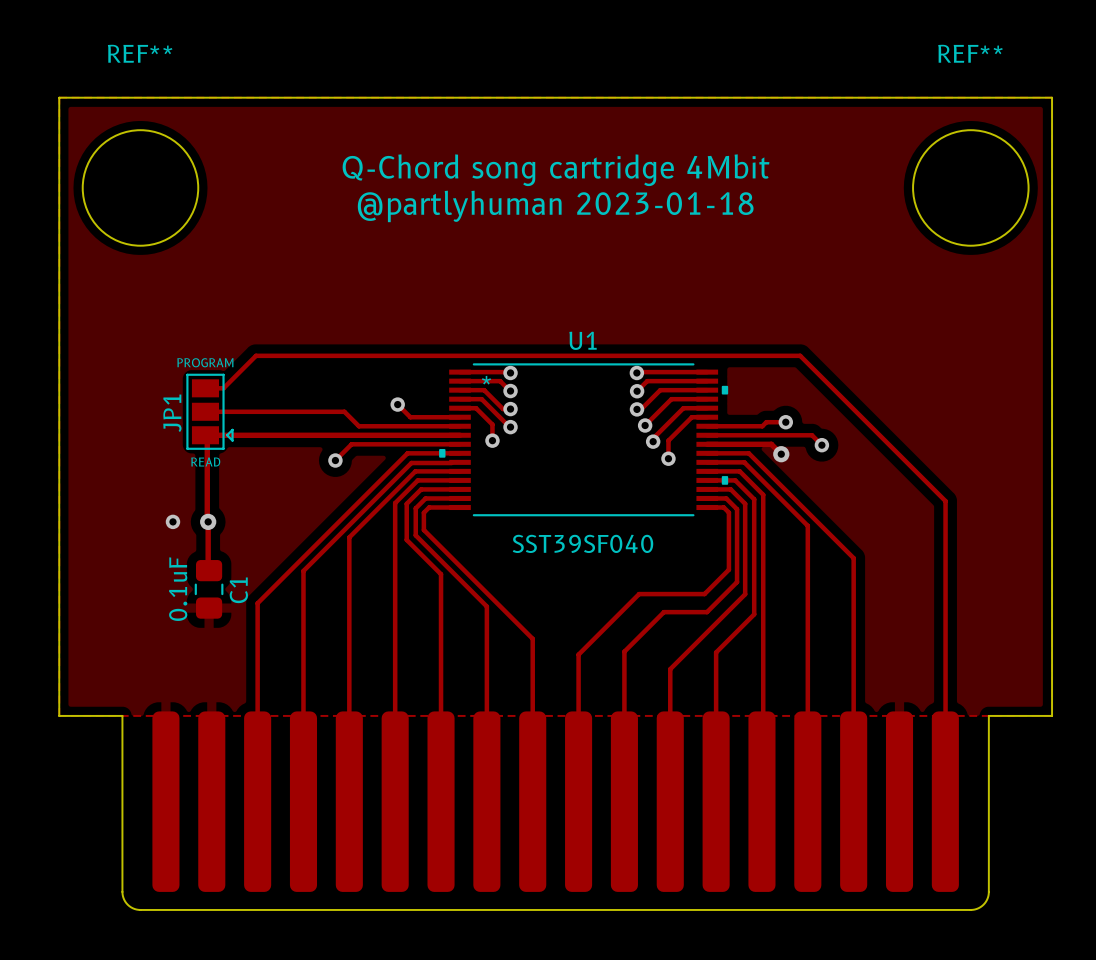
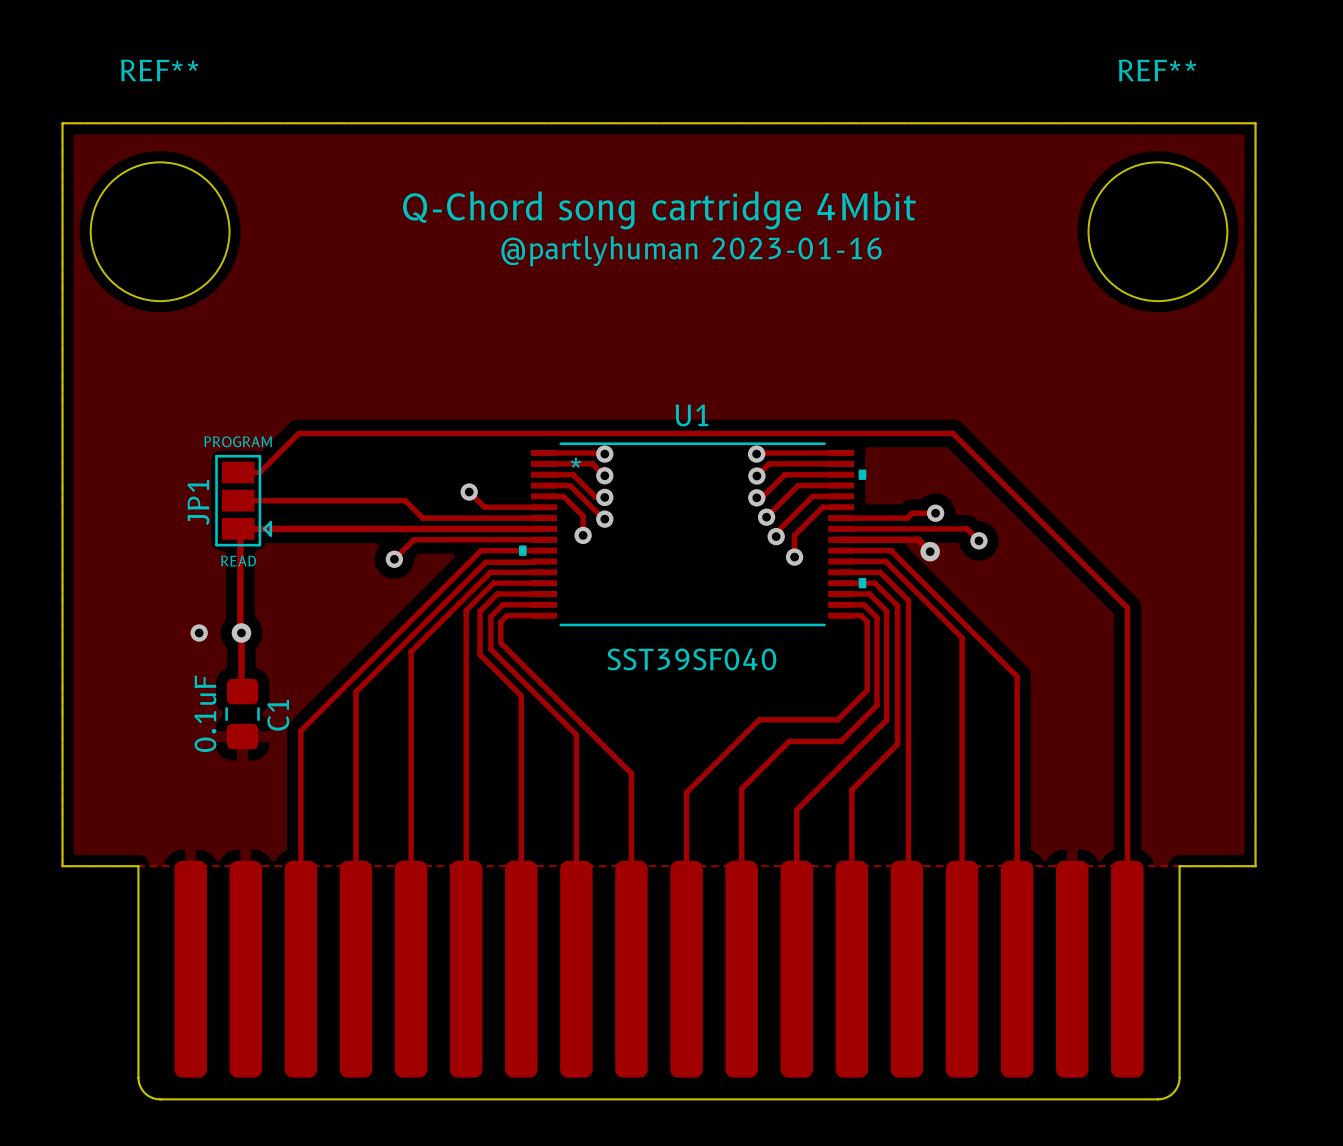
text: @partlyhuman 2023-01-18 (555, 206) -> @partlyhuman 2023-01-16 (691, 251)

